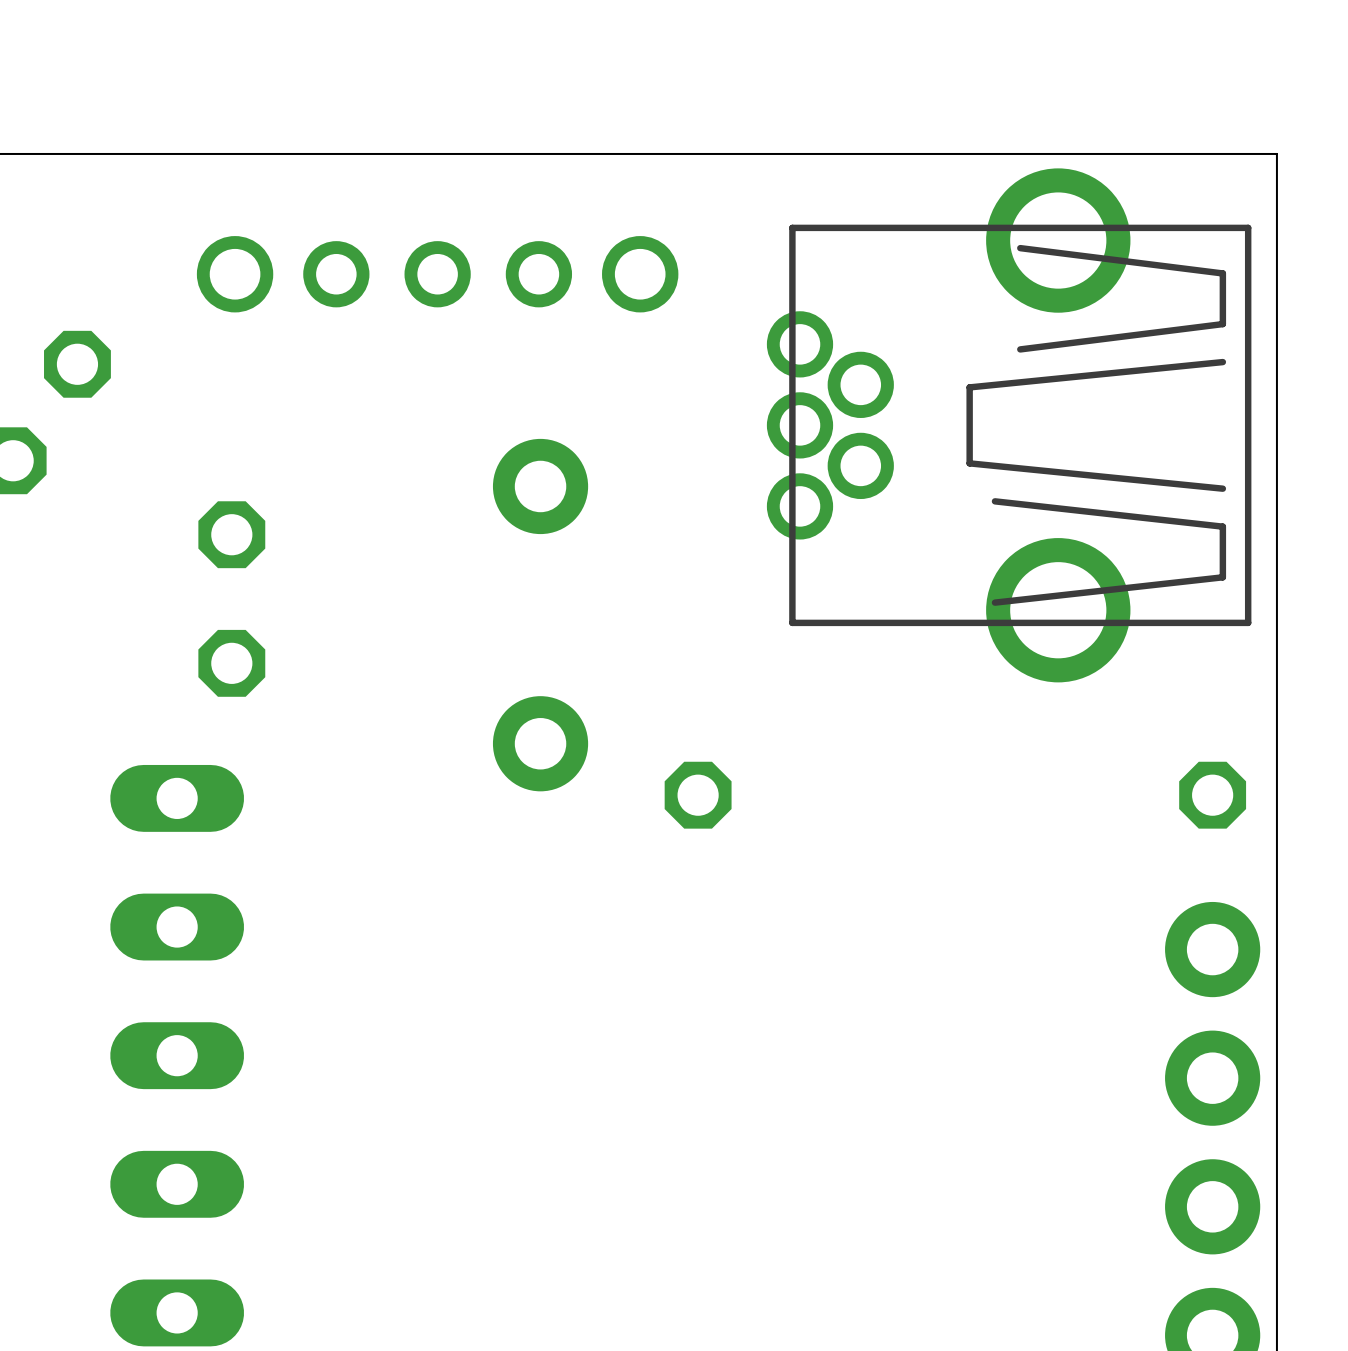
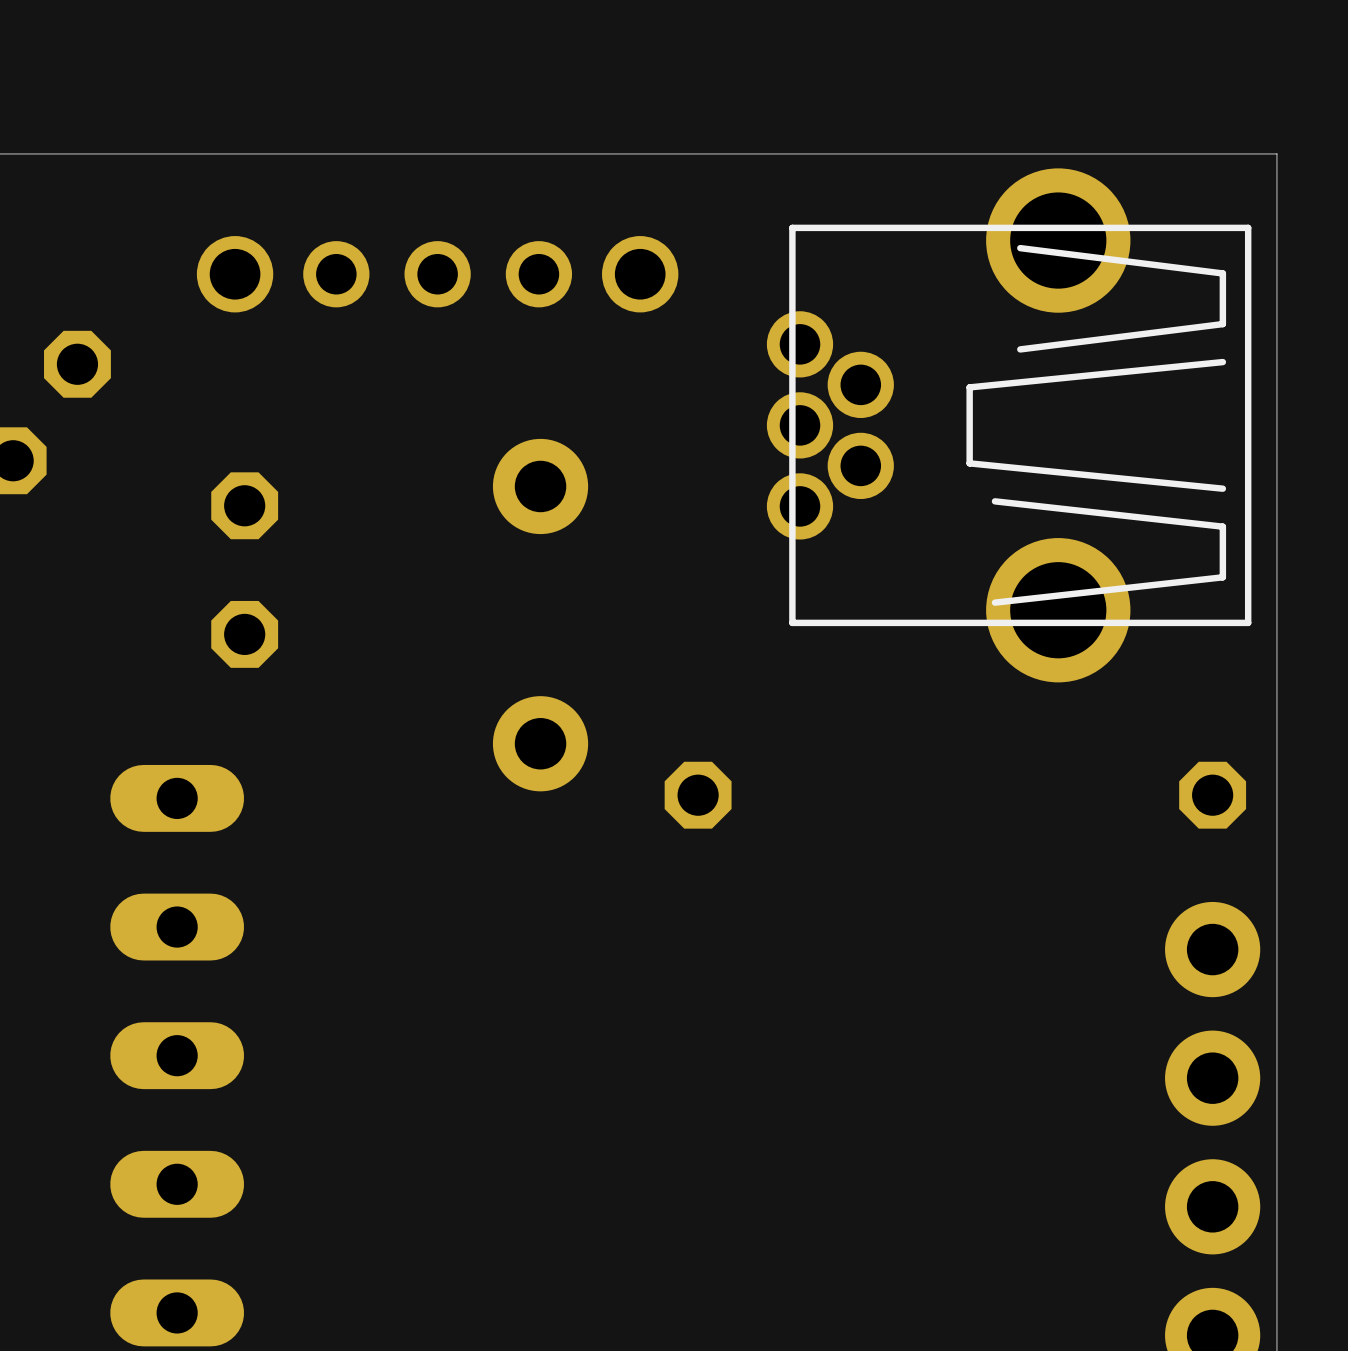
part position: (231, 599) -> (244, 570)

